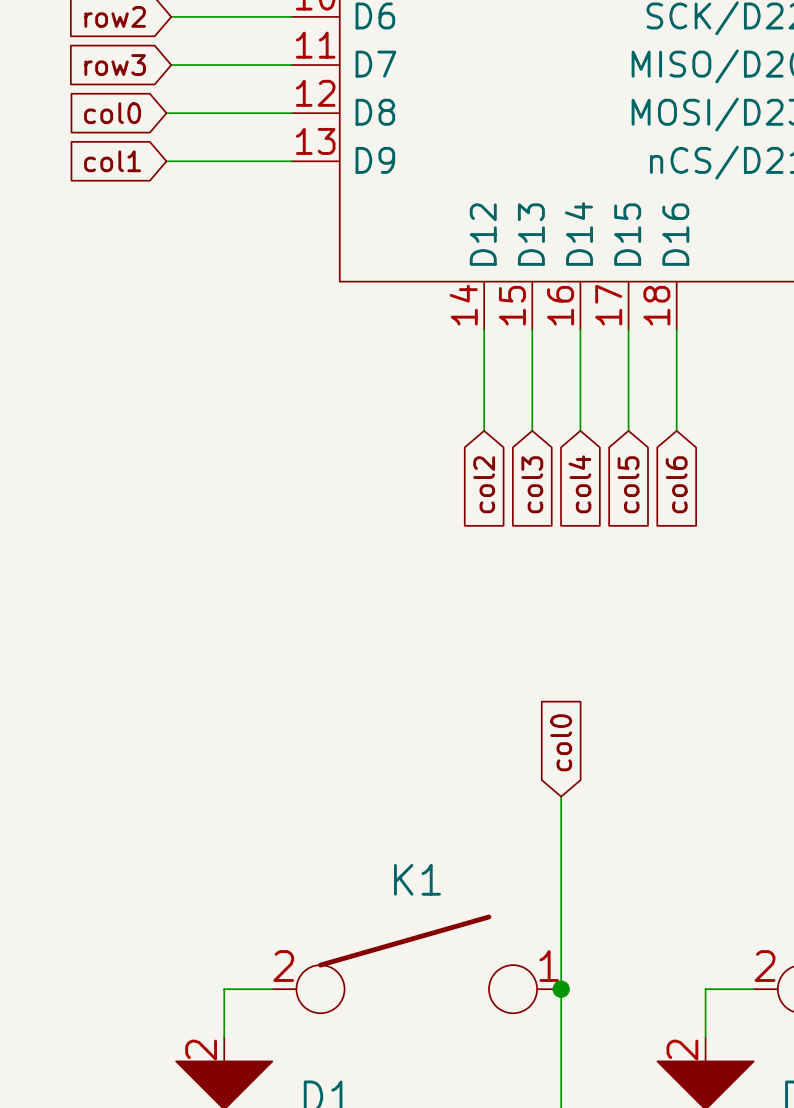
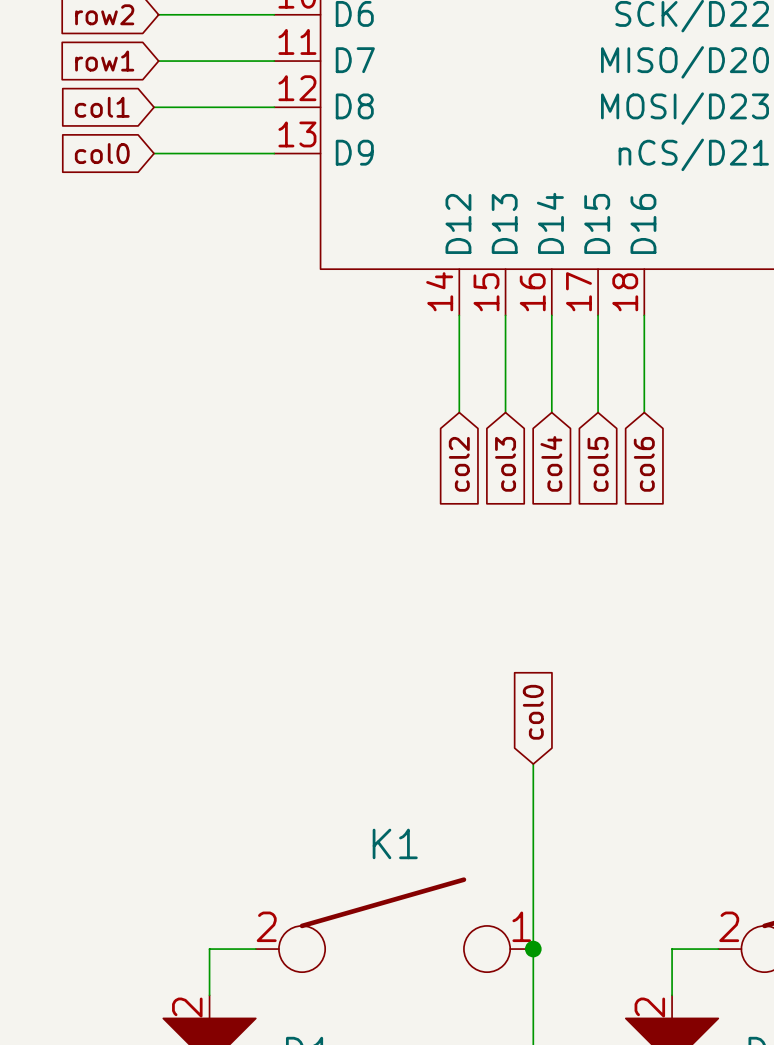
global label: row3 (115, 65) -> row1 (104, 61)
global label: col0 (112, 113) -> col1 (102, 107)
global label: col1 (112, 161) -> col0 (102, 153)

